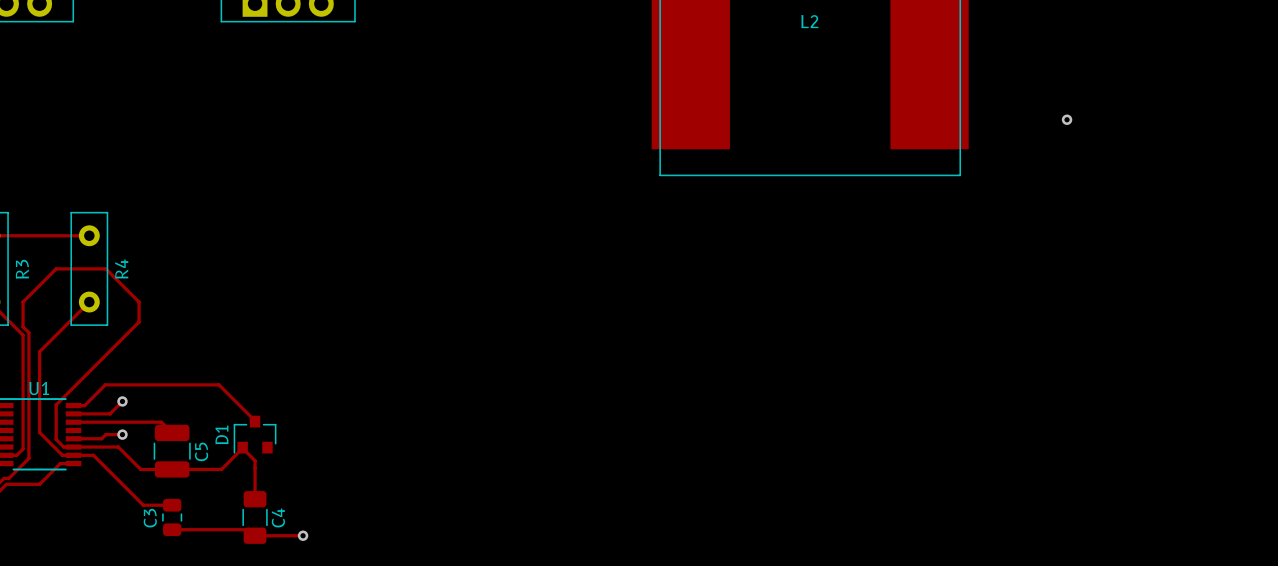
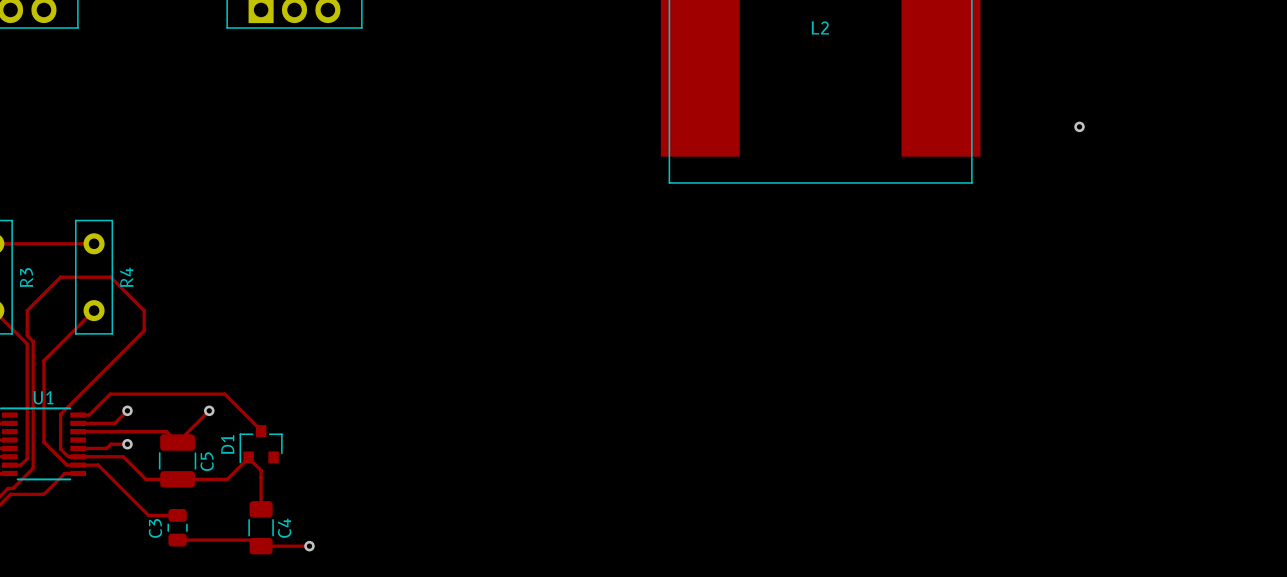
track: none -> (209, 410) (177, 442)
via: none -> (209, 410)

